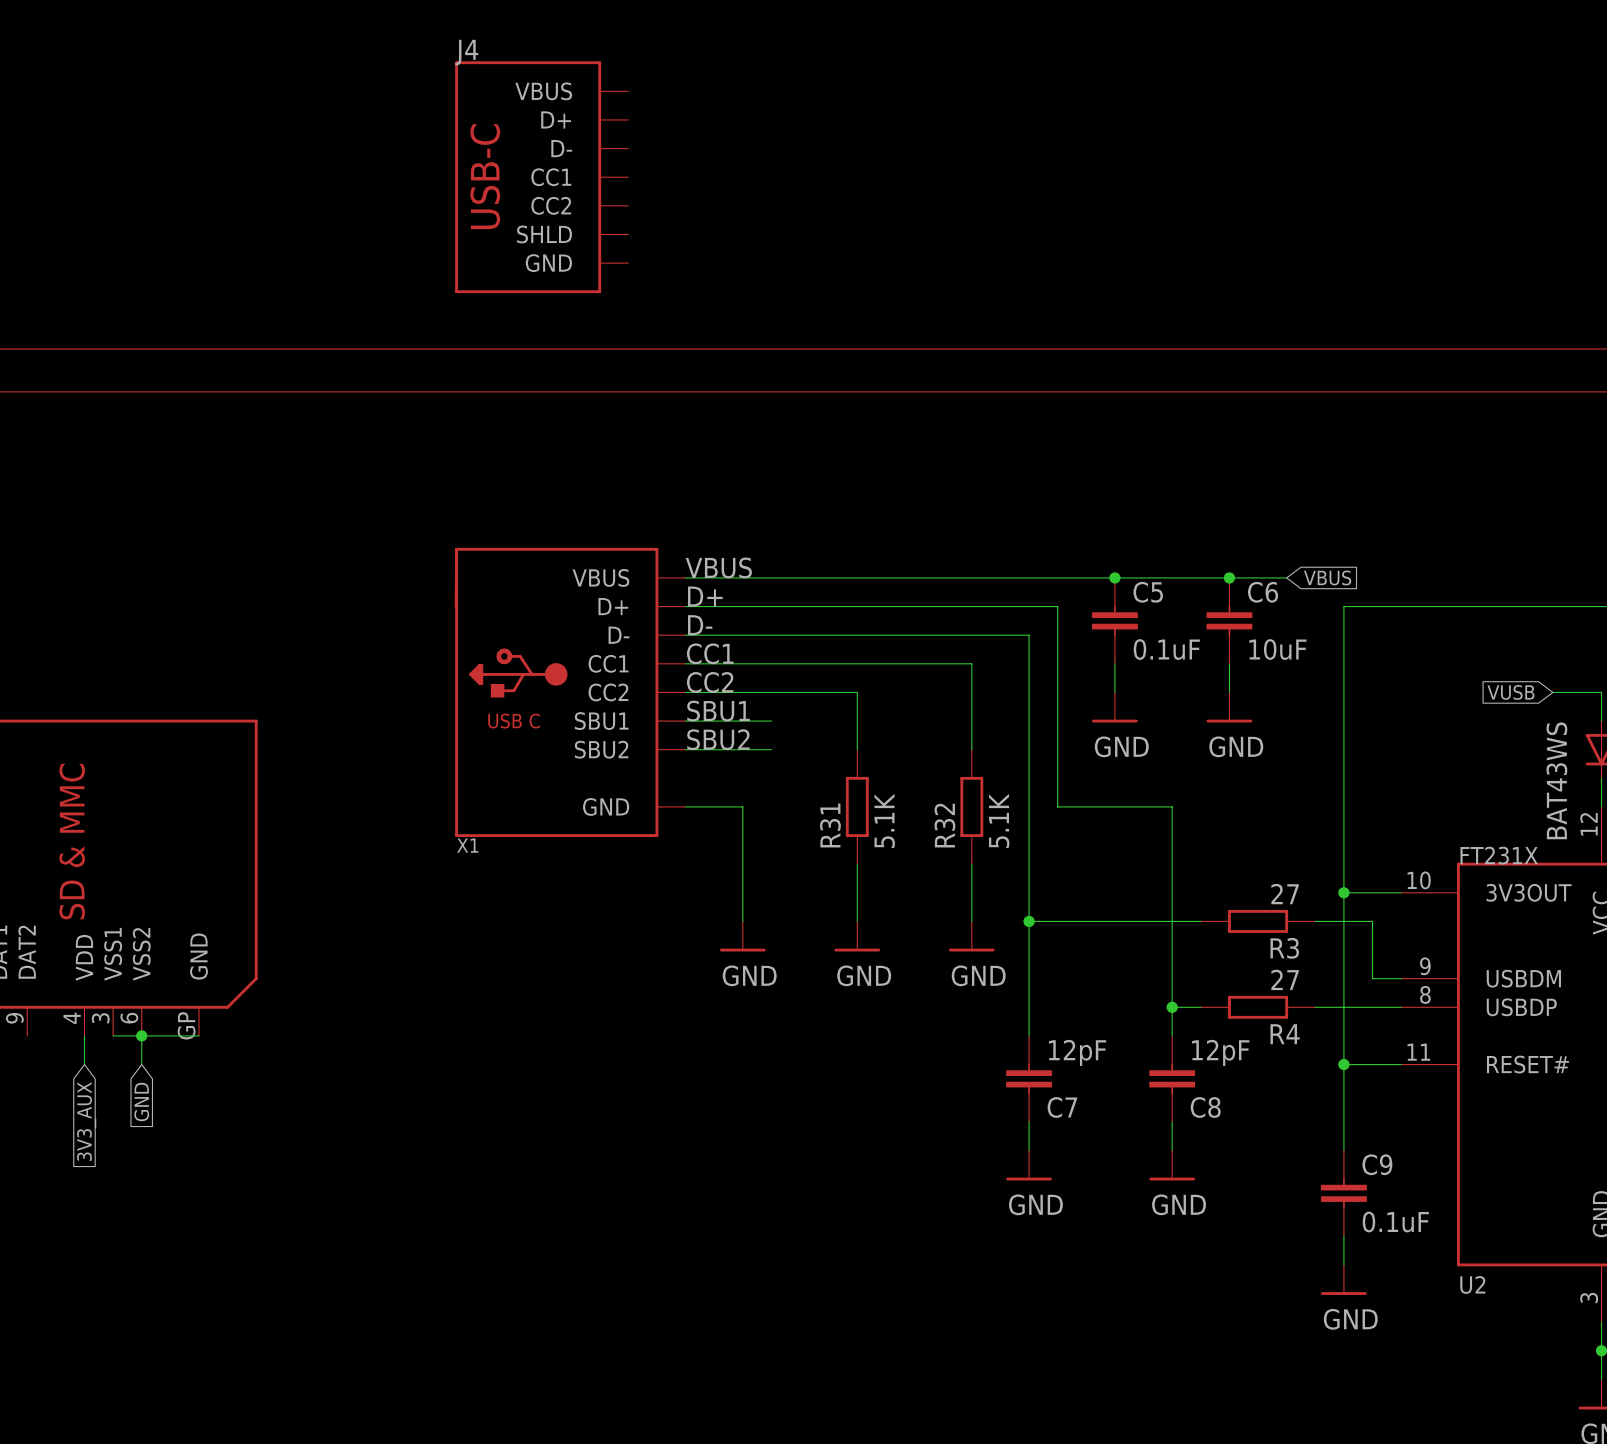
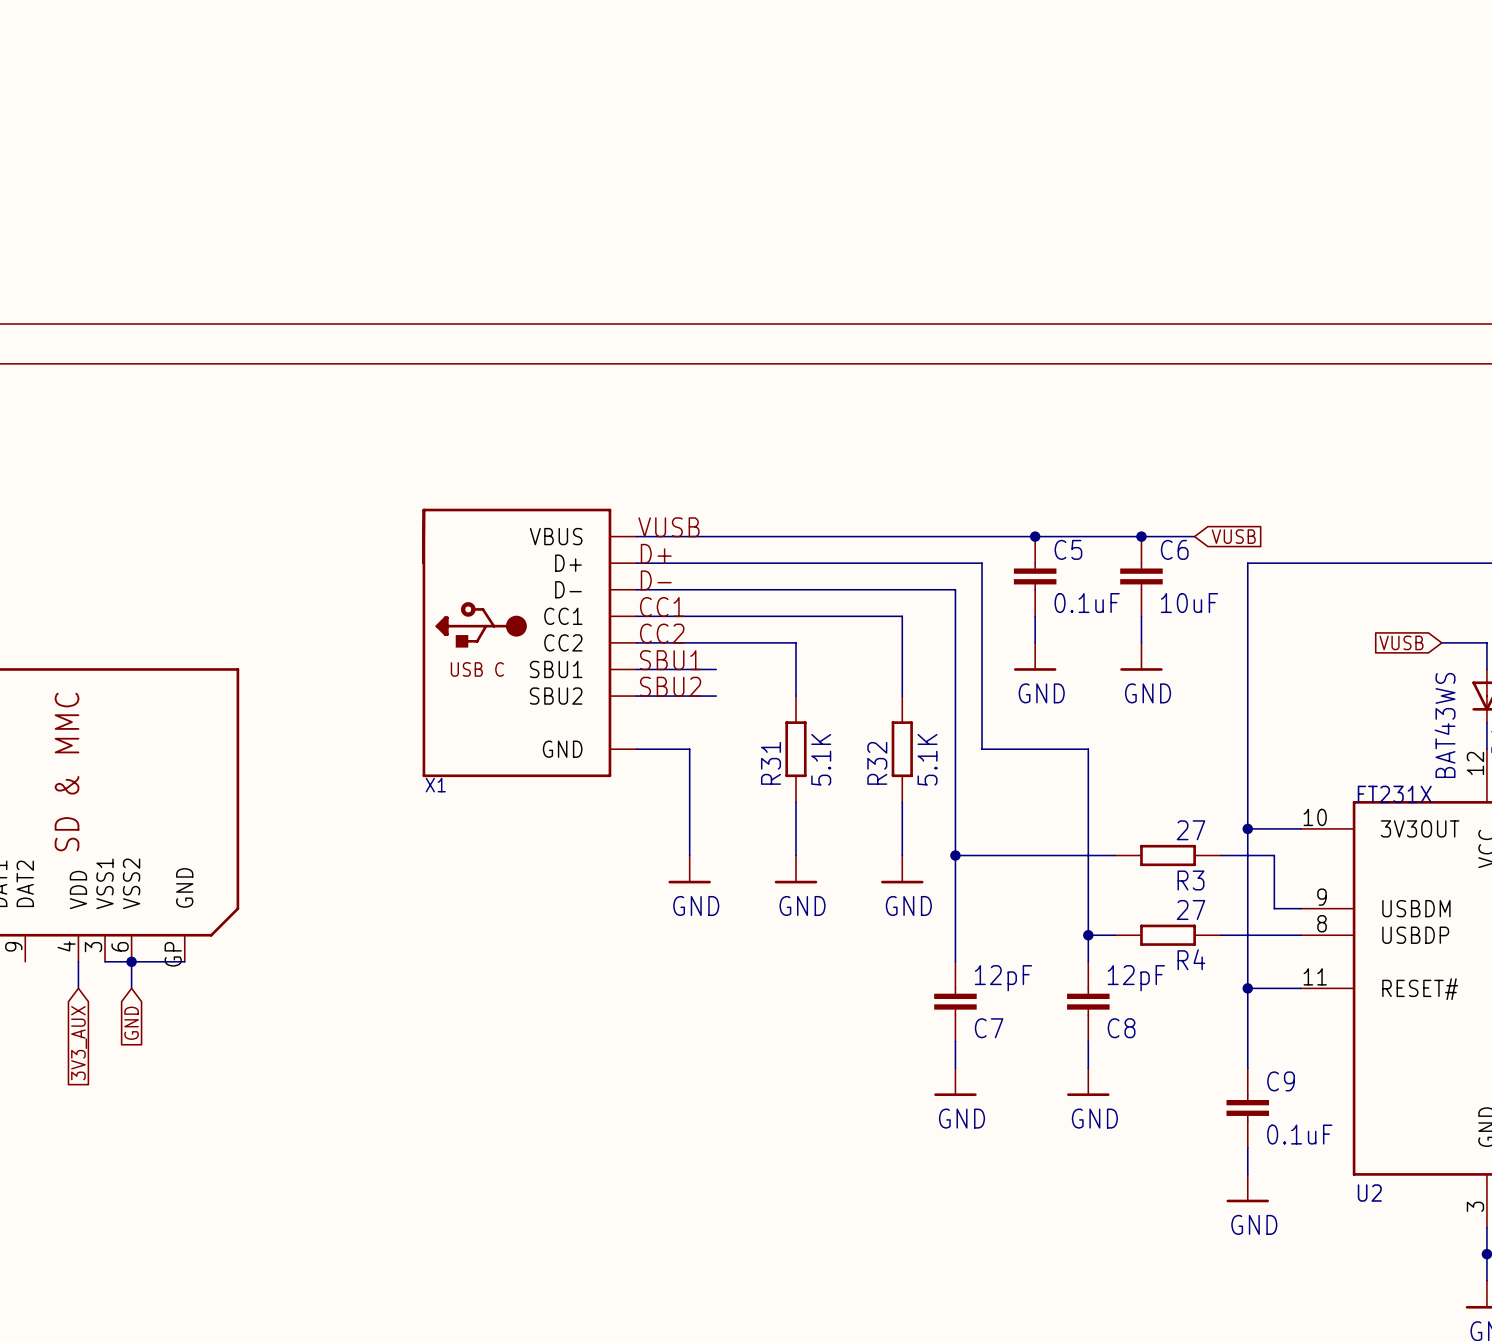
J4: (541, 177) -> none
label: VBUS (718, 567) -> VUSB (669, 527)
global label: VBUS (1327, 577) -> VUSB (1233, 536)

